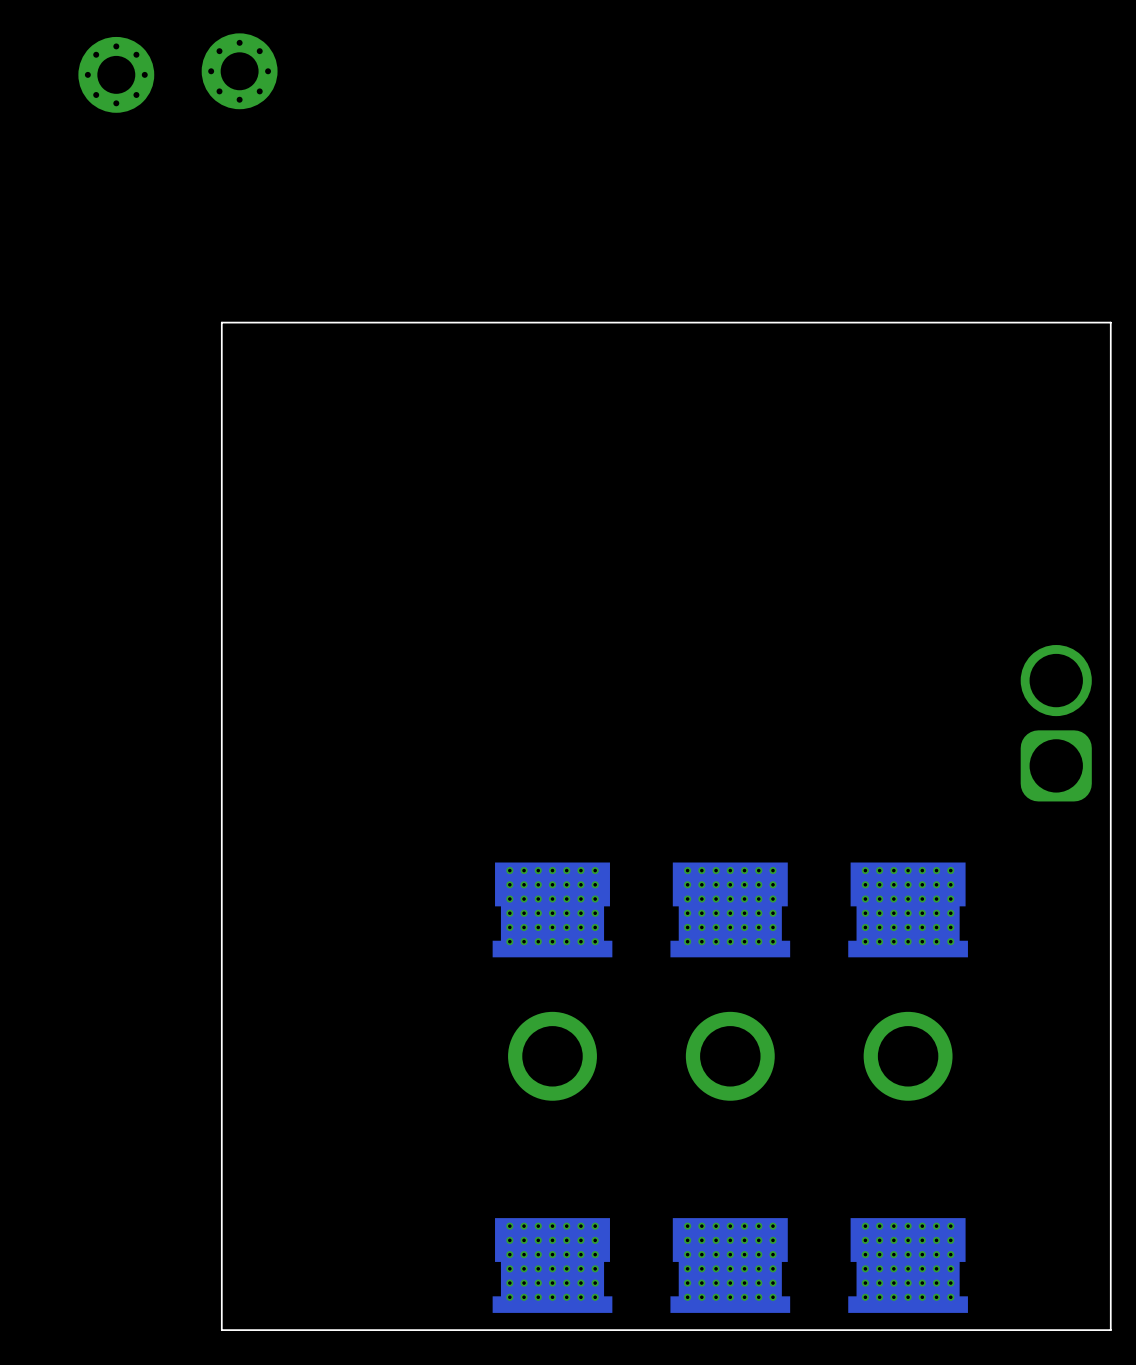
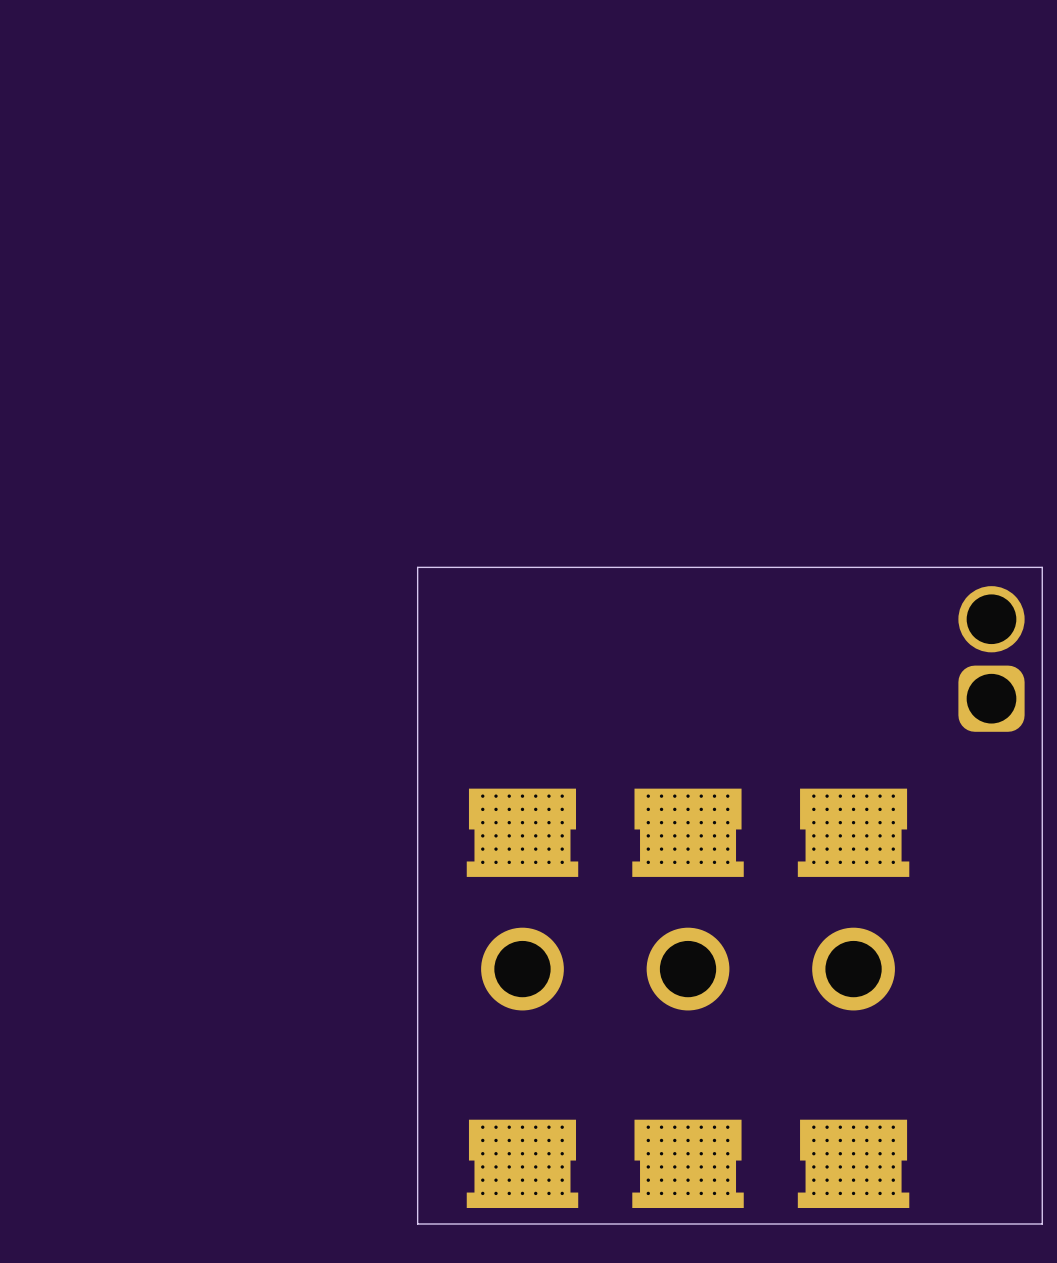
part: (239, 71) -> none
part: (116, 74) -> none
board edge: (1110, 624) (1110, 322) (221, 322) (221, 1330) (439, 1330) -> (1042, 567) (417, 567) (417, 1224)

